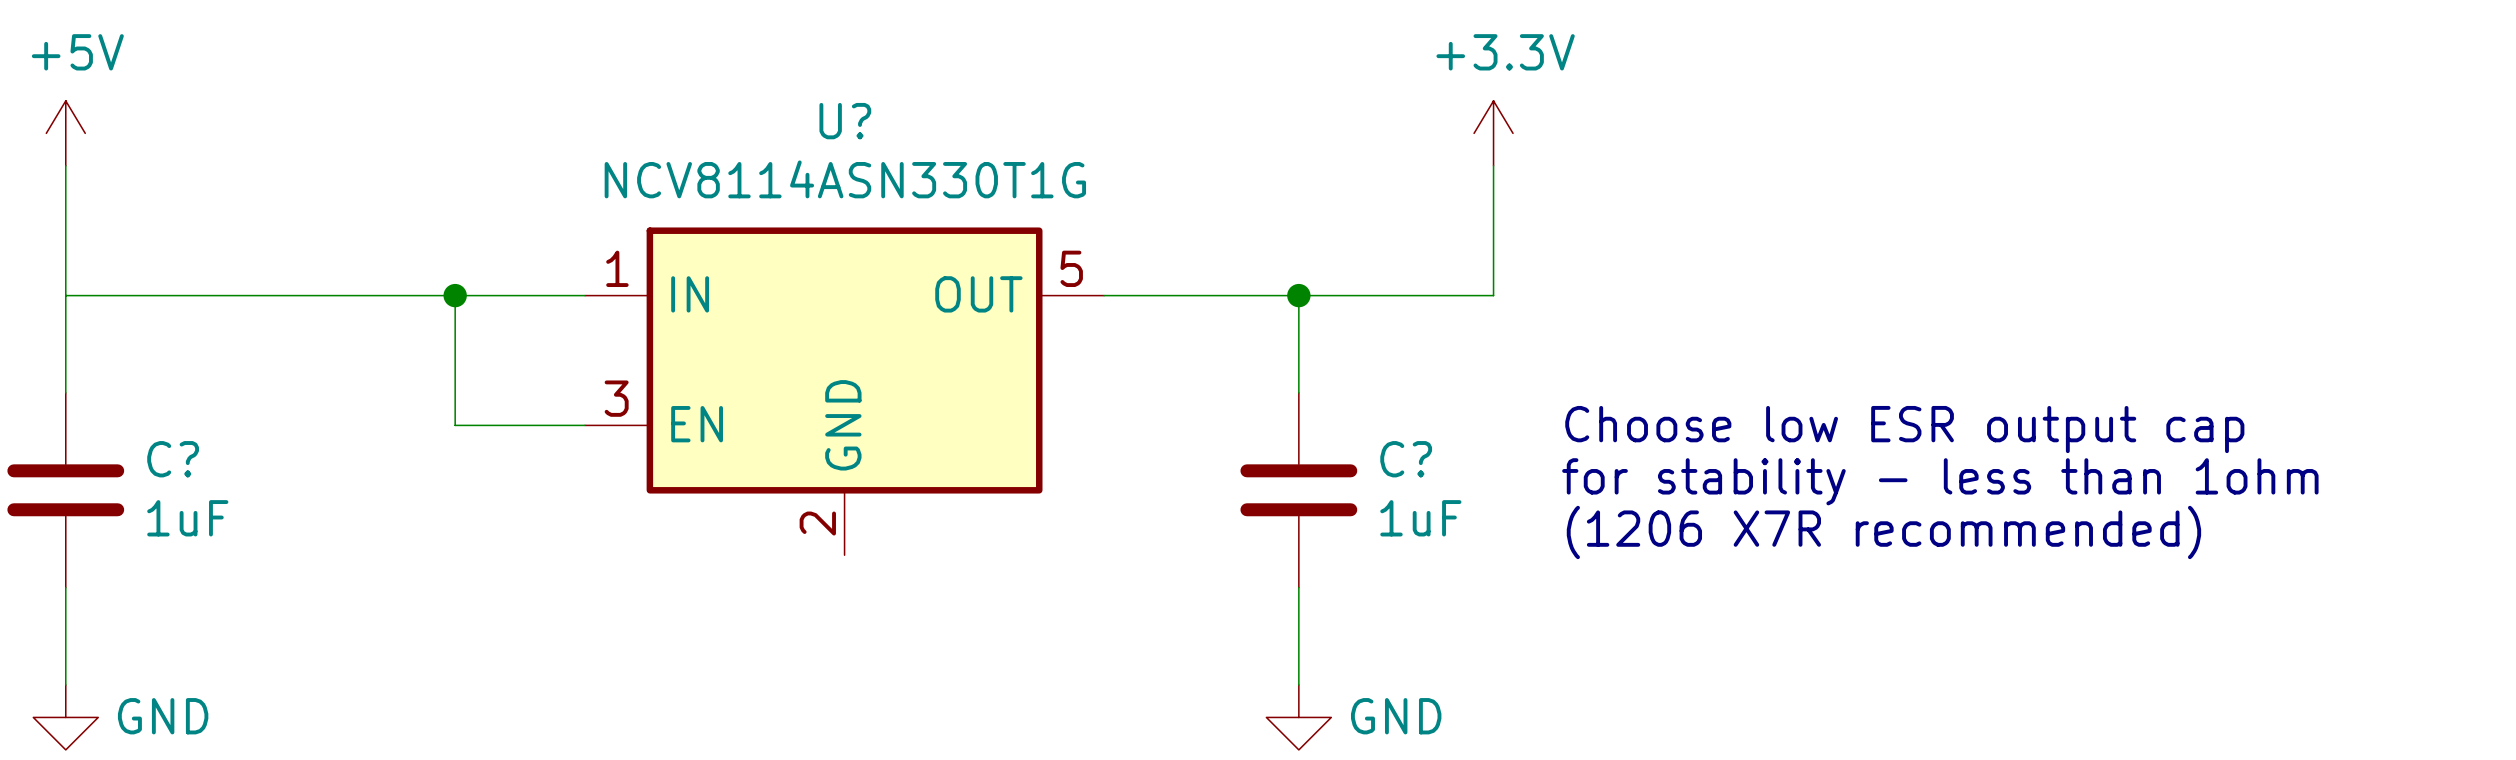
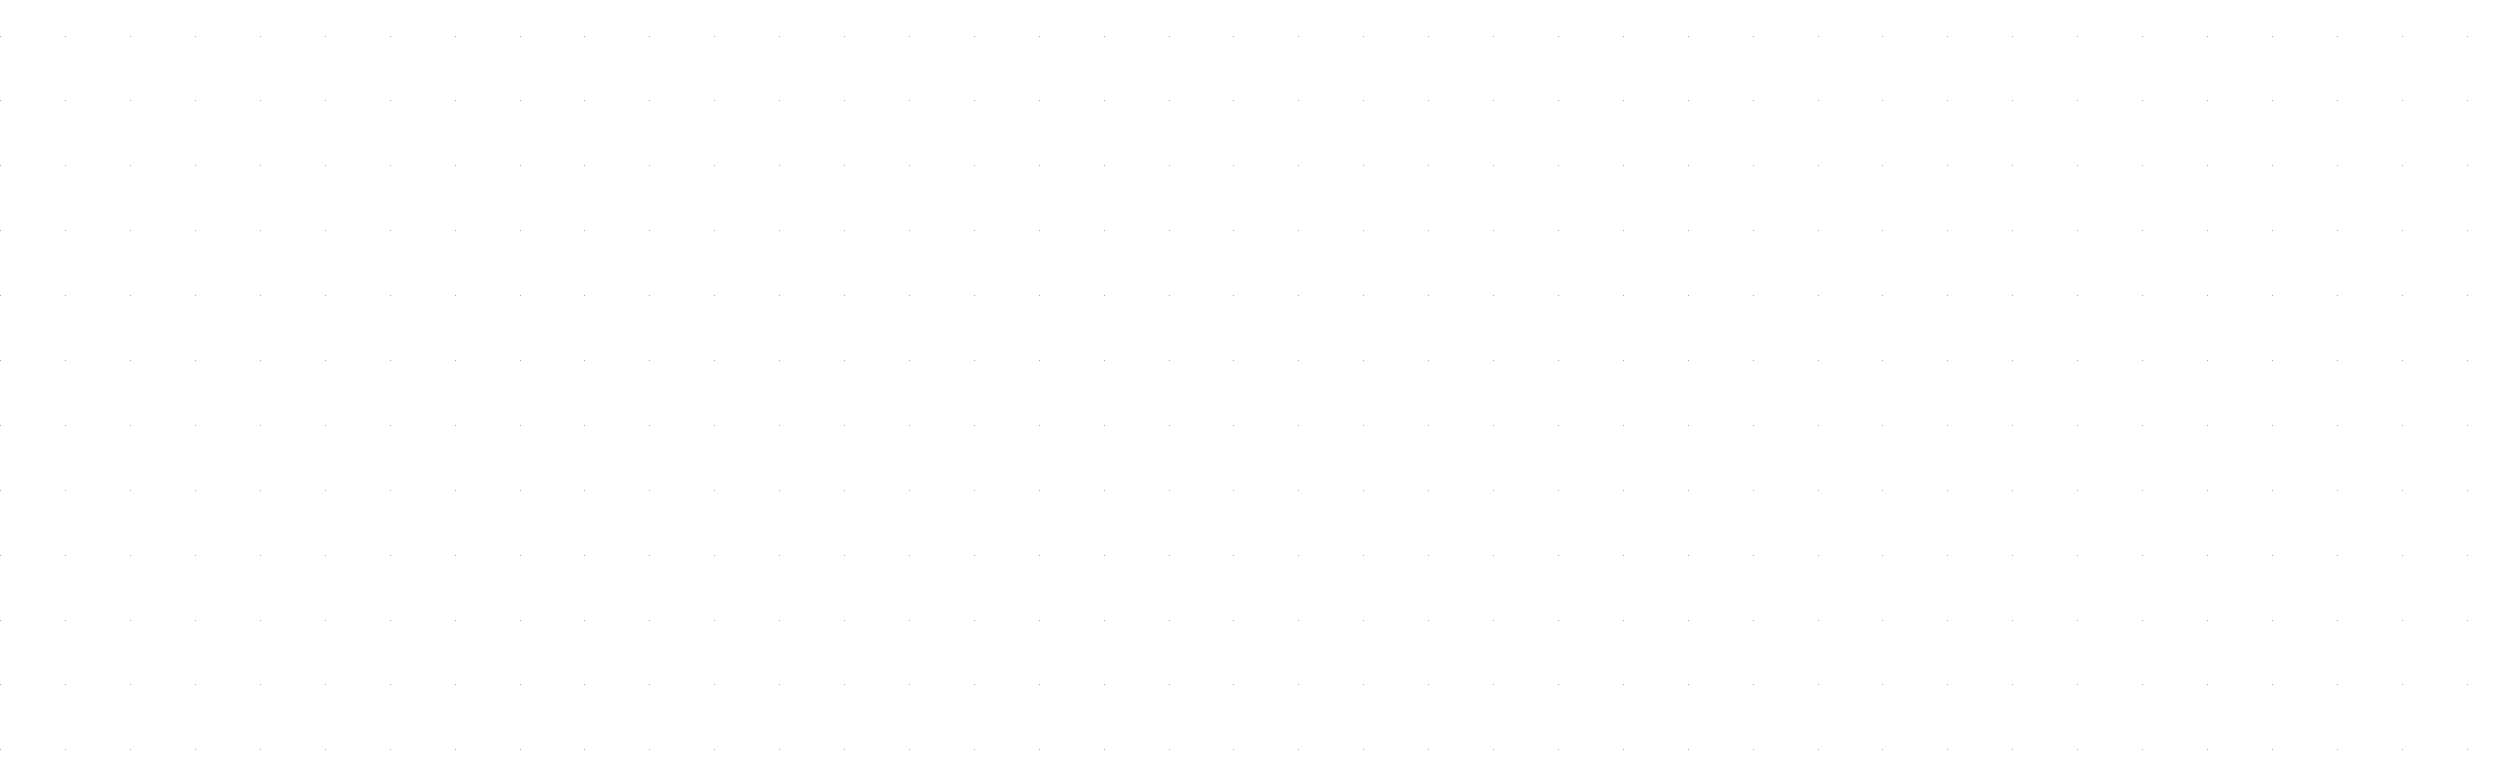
power symbol: +5V (65, 133) -> none
power symbol: +3.3V (1493, 133) -> none
wire: (65, 165) (65, 392) -> none
wire: (1493, 165) (1493, 295) (1104, 295) -> none
wire: (65, 295) (584, 295) -> none
wire: (455, 295) (455, 425) (584, 425) -> none
junction: (455, 295) -> none
wire: (1298, 295) (1298, 392) -> none
junction: (1298, 295) -> none
U?: NCV8114ASN330T1G (844, 391) -> none
text: Choose low ESR output cap (1904, 429) -> none
text: for stability - less than 1ohm (1940, 481) -> none
C?: 1uF (65, 490) -> none
C?: 1uF (1298, 490) -> none
text: (1206 X7R recommended) (1883, 532) -> none
wire: (65, 587) (65, 684) -> none
wire: (1298, 587) (1298, 684) -> none
power symbol: GND (65, 717) -> none
power symbol: GND (1298, 717) -> none

